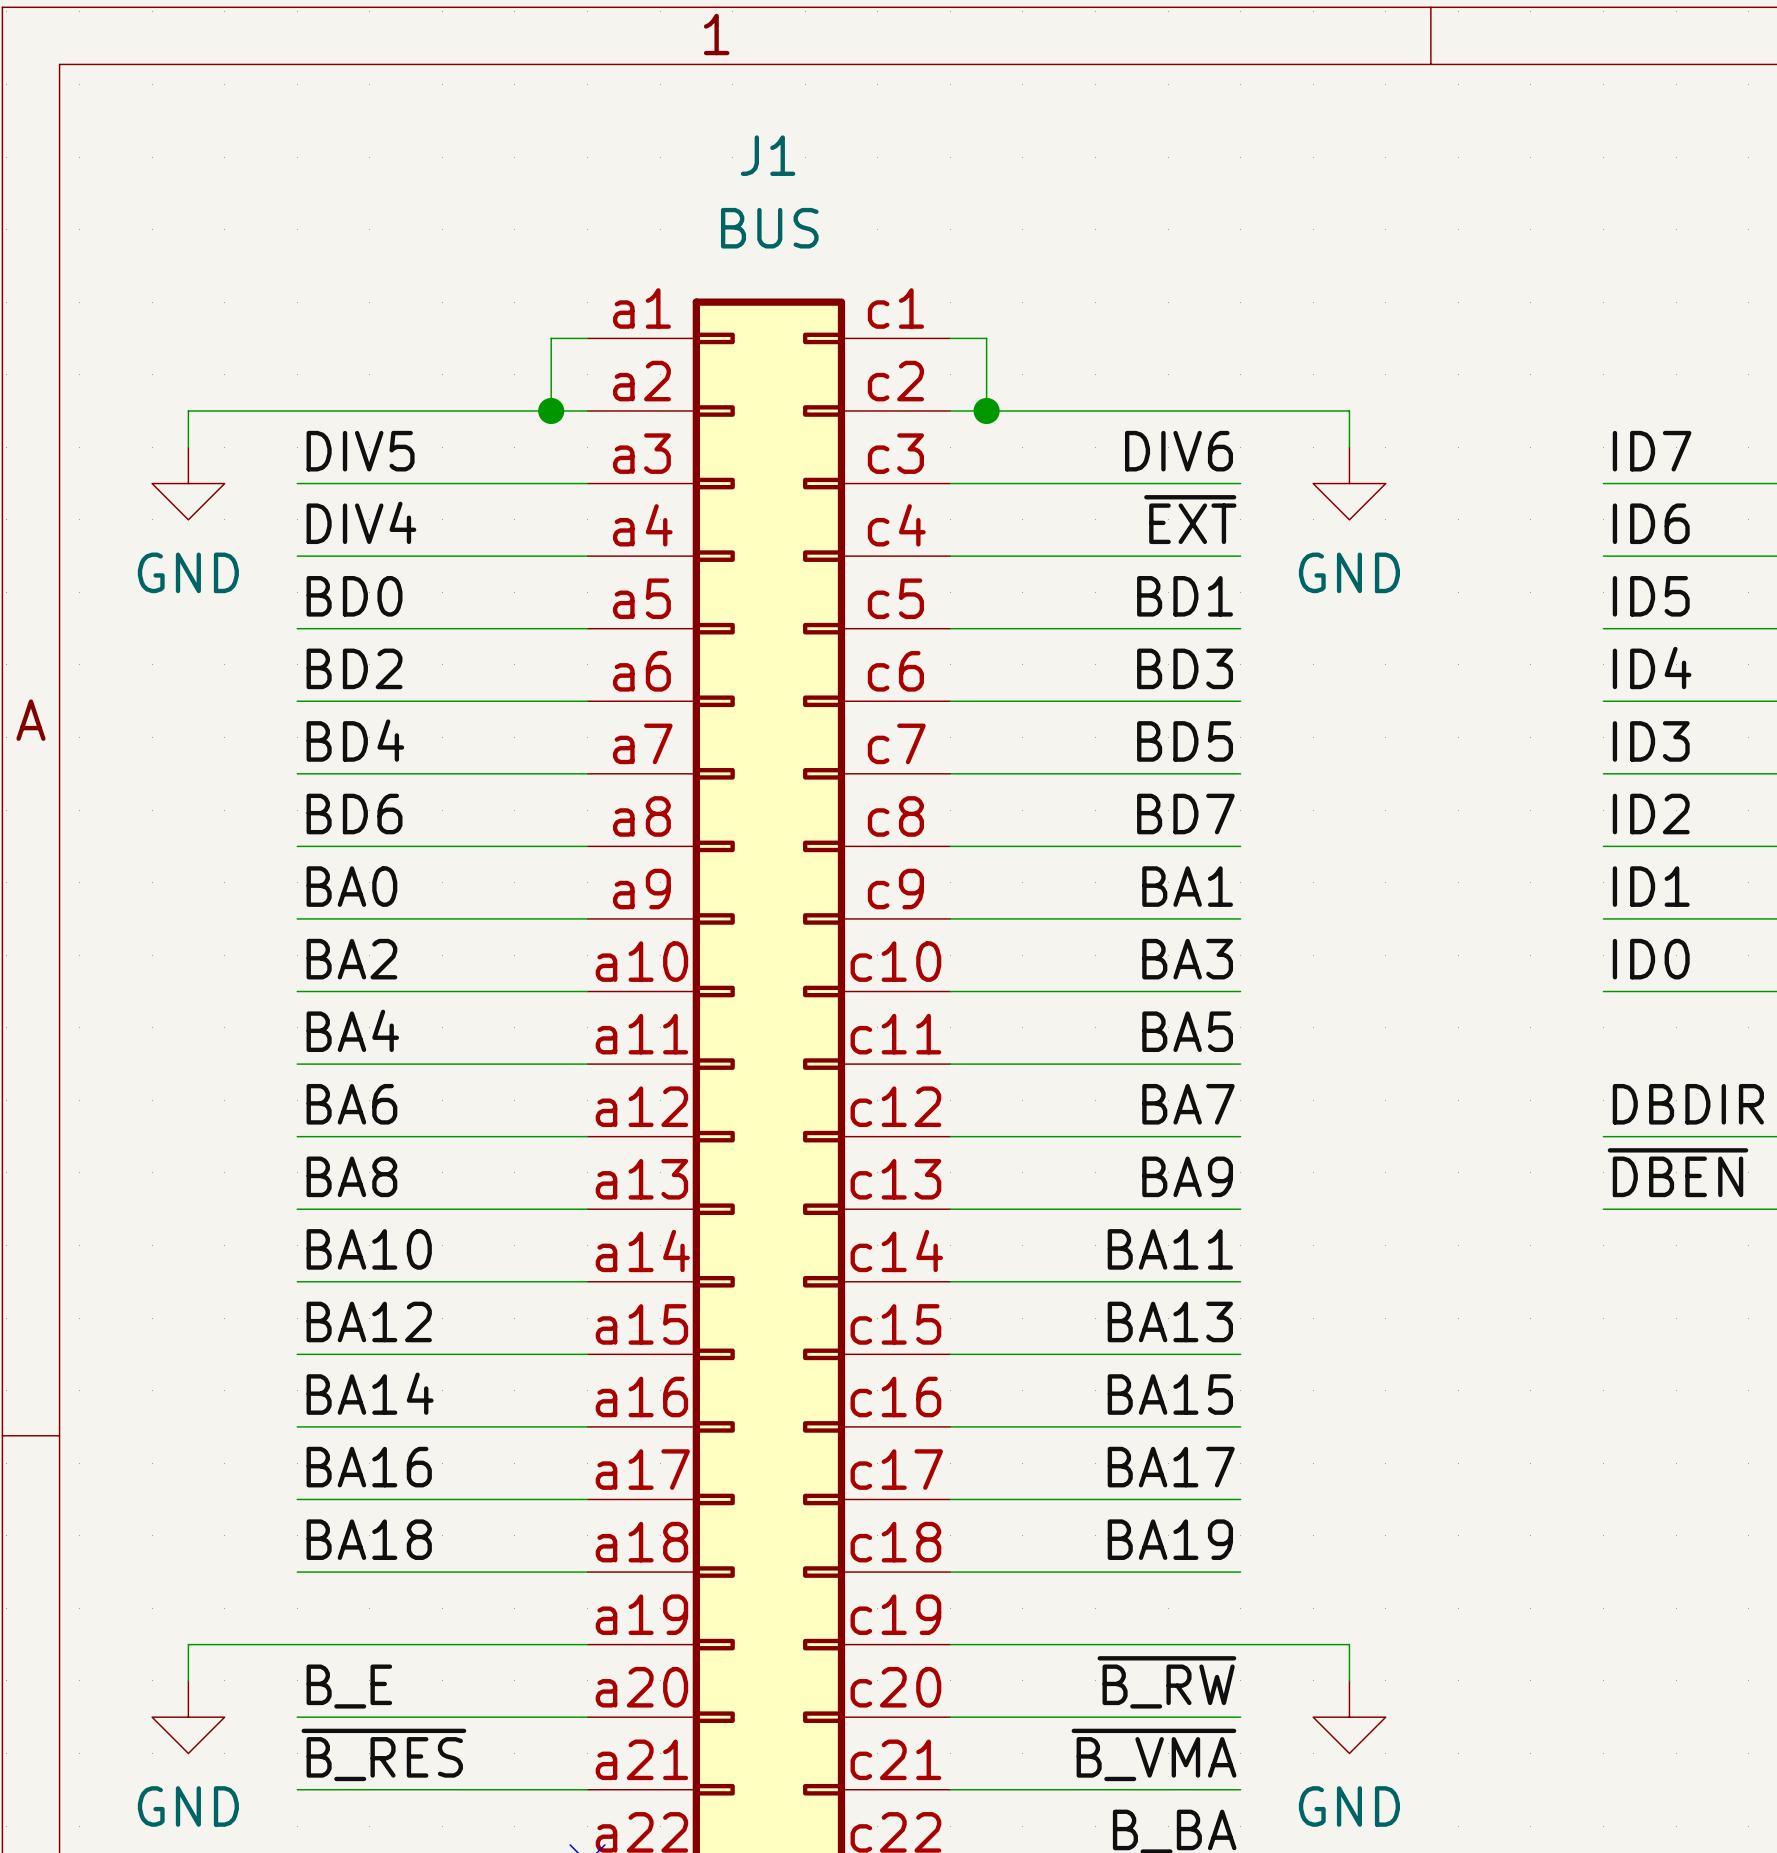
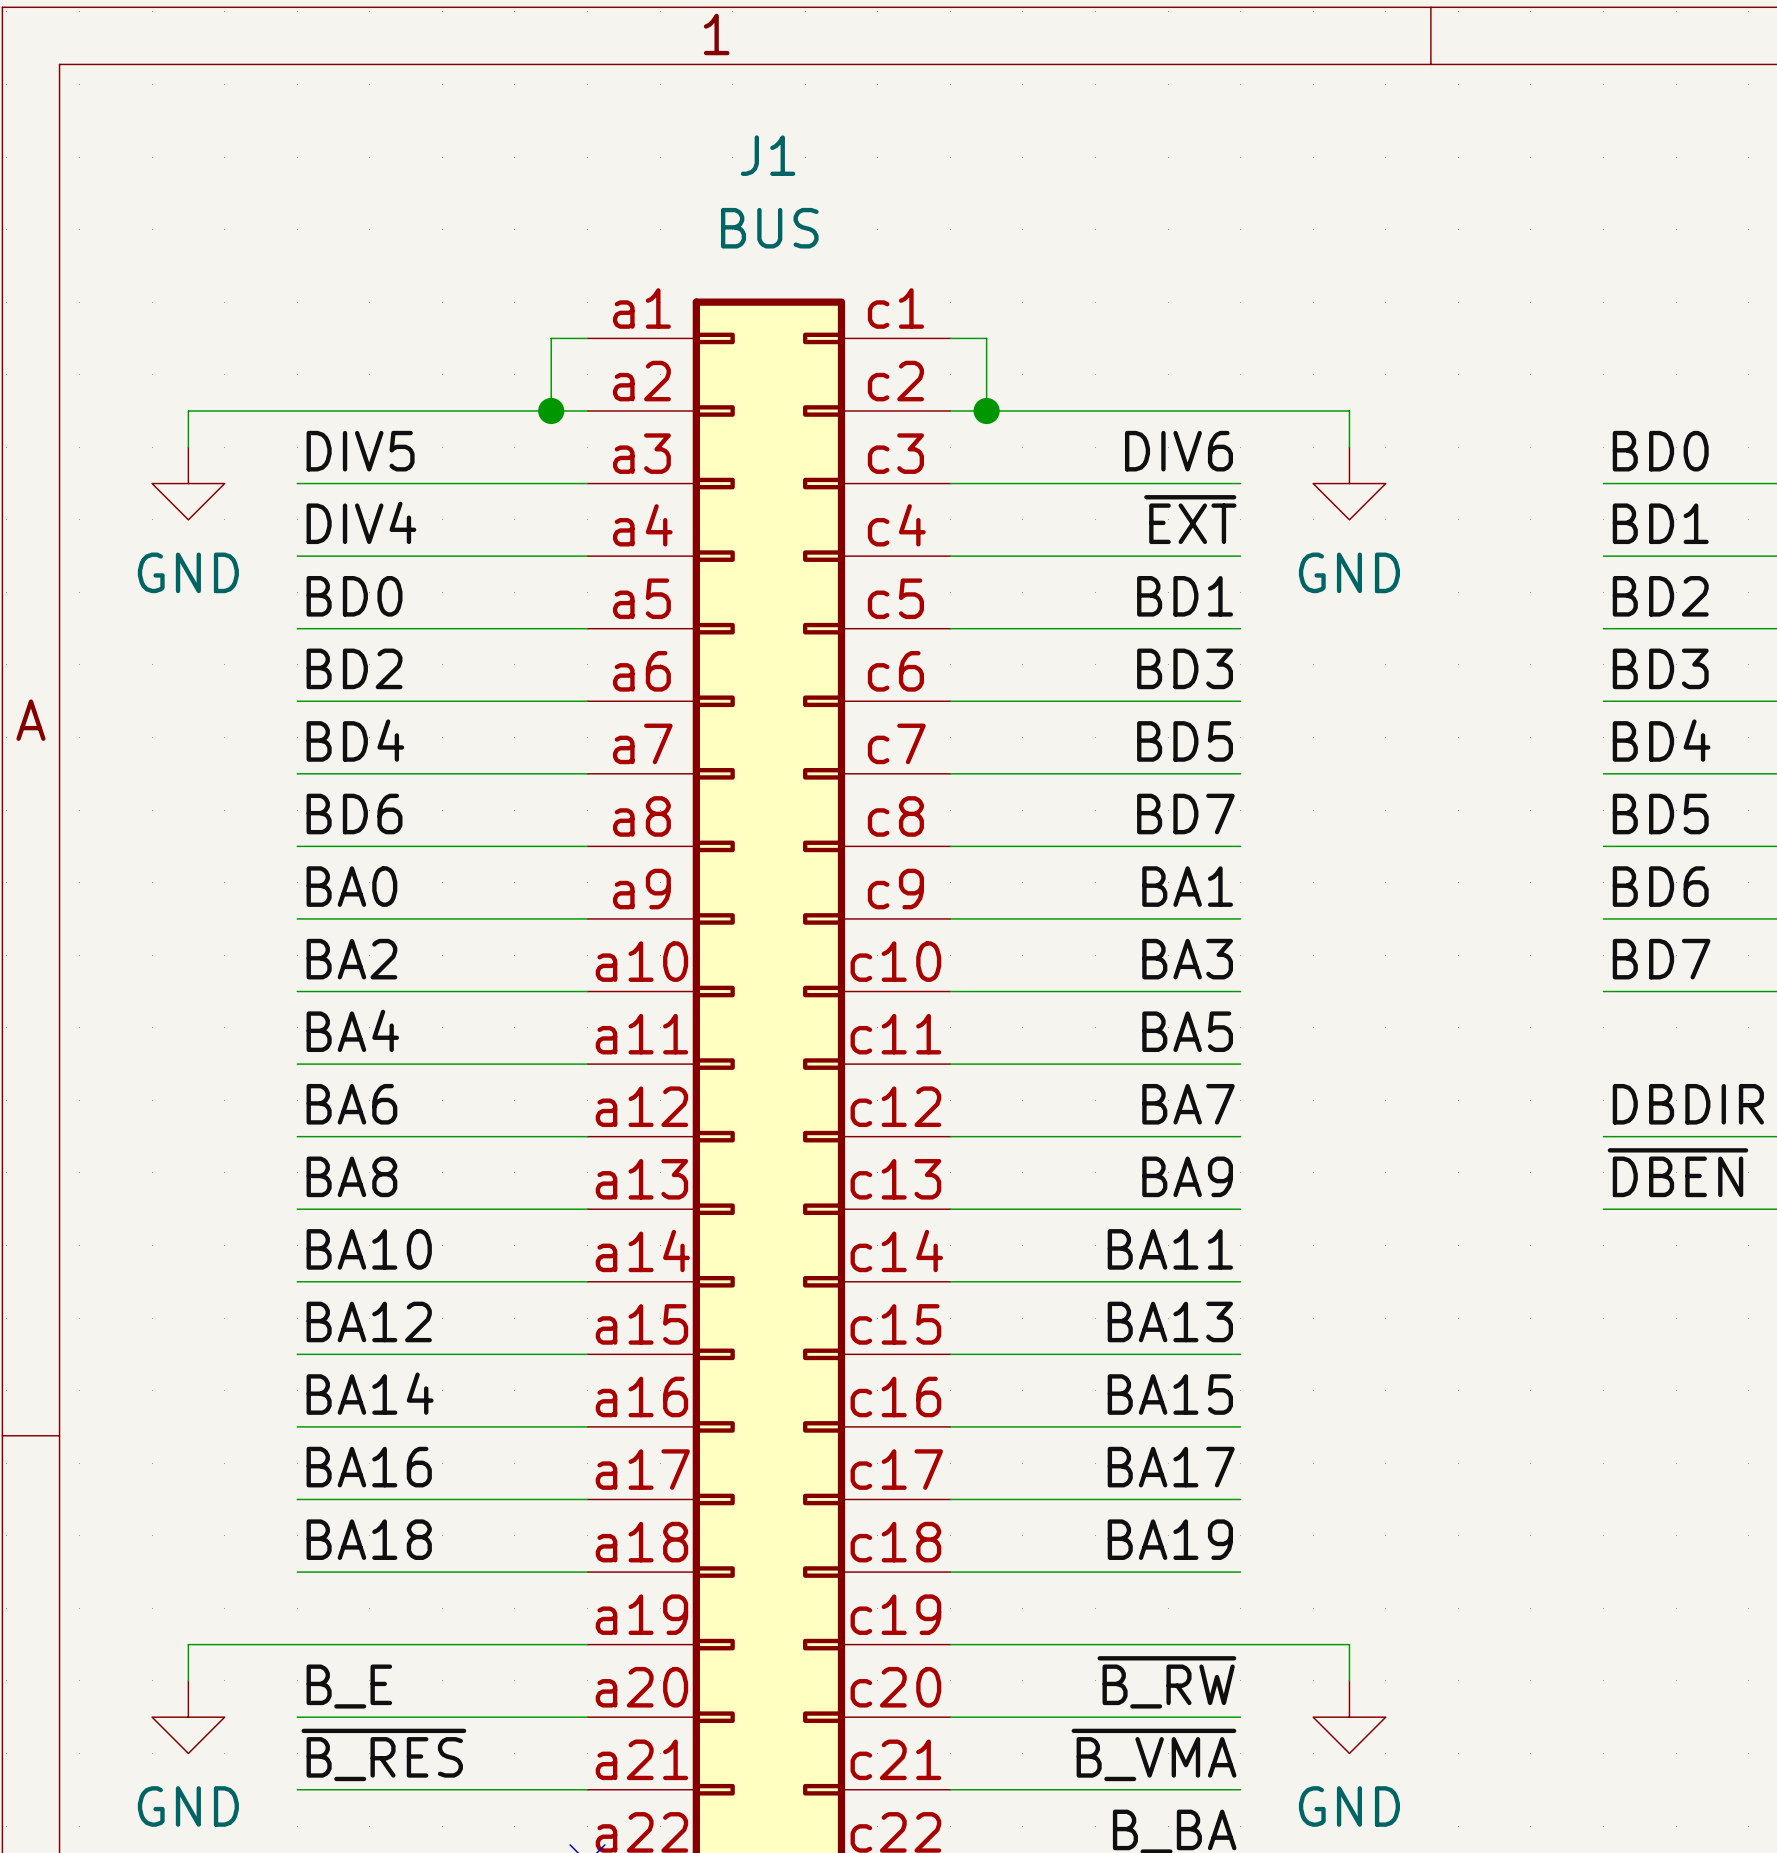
label: ID7 (1652, 451) -> BD0 (1660, 451)
label: ID6 (1651, 523) -> BD1 (1660, 523)
label: ID5 (1651, 596) -> BD2 (1660, 596)
label: ID4 (1652, 668) -> BD3 (1660, 668)
label: ID3 (1651, 741) -> BD4 (1661, 740)
label: ID2 (1651, 814) -> BD5 (1660, 814)
label: ID1 (1651, 886) -> BD6 (1660, 886)
label: ID0 (1651, 959) -> BD7 (1661, 959)

